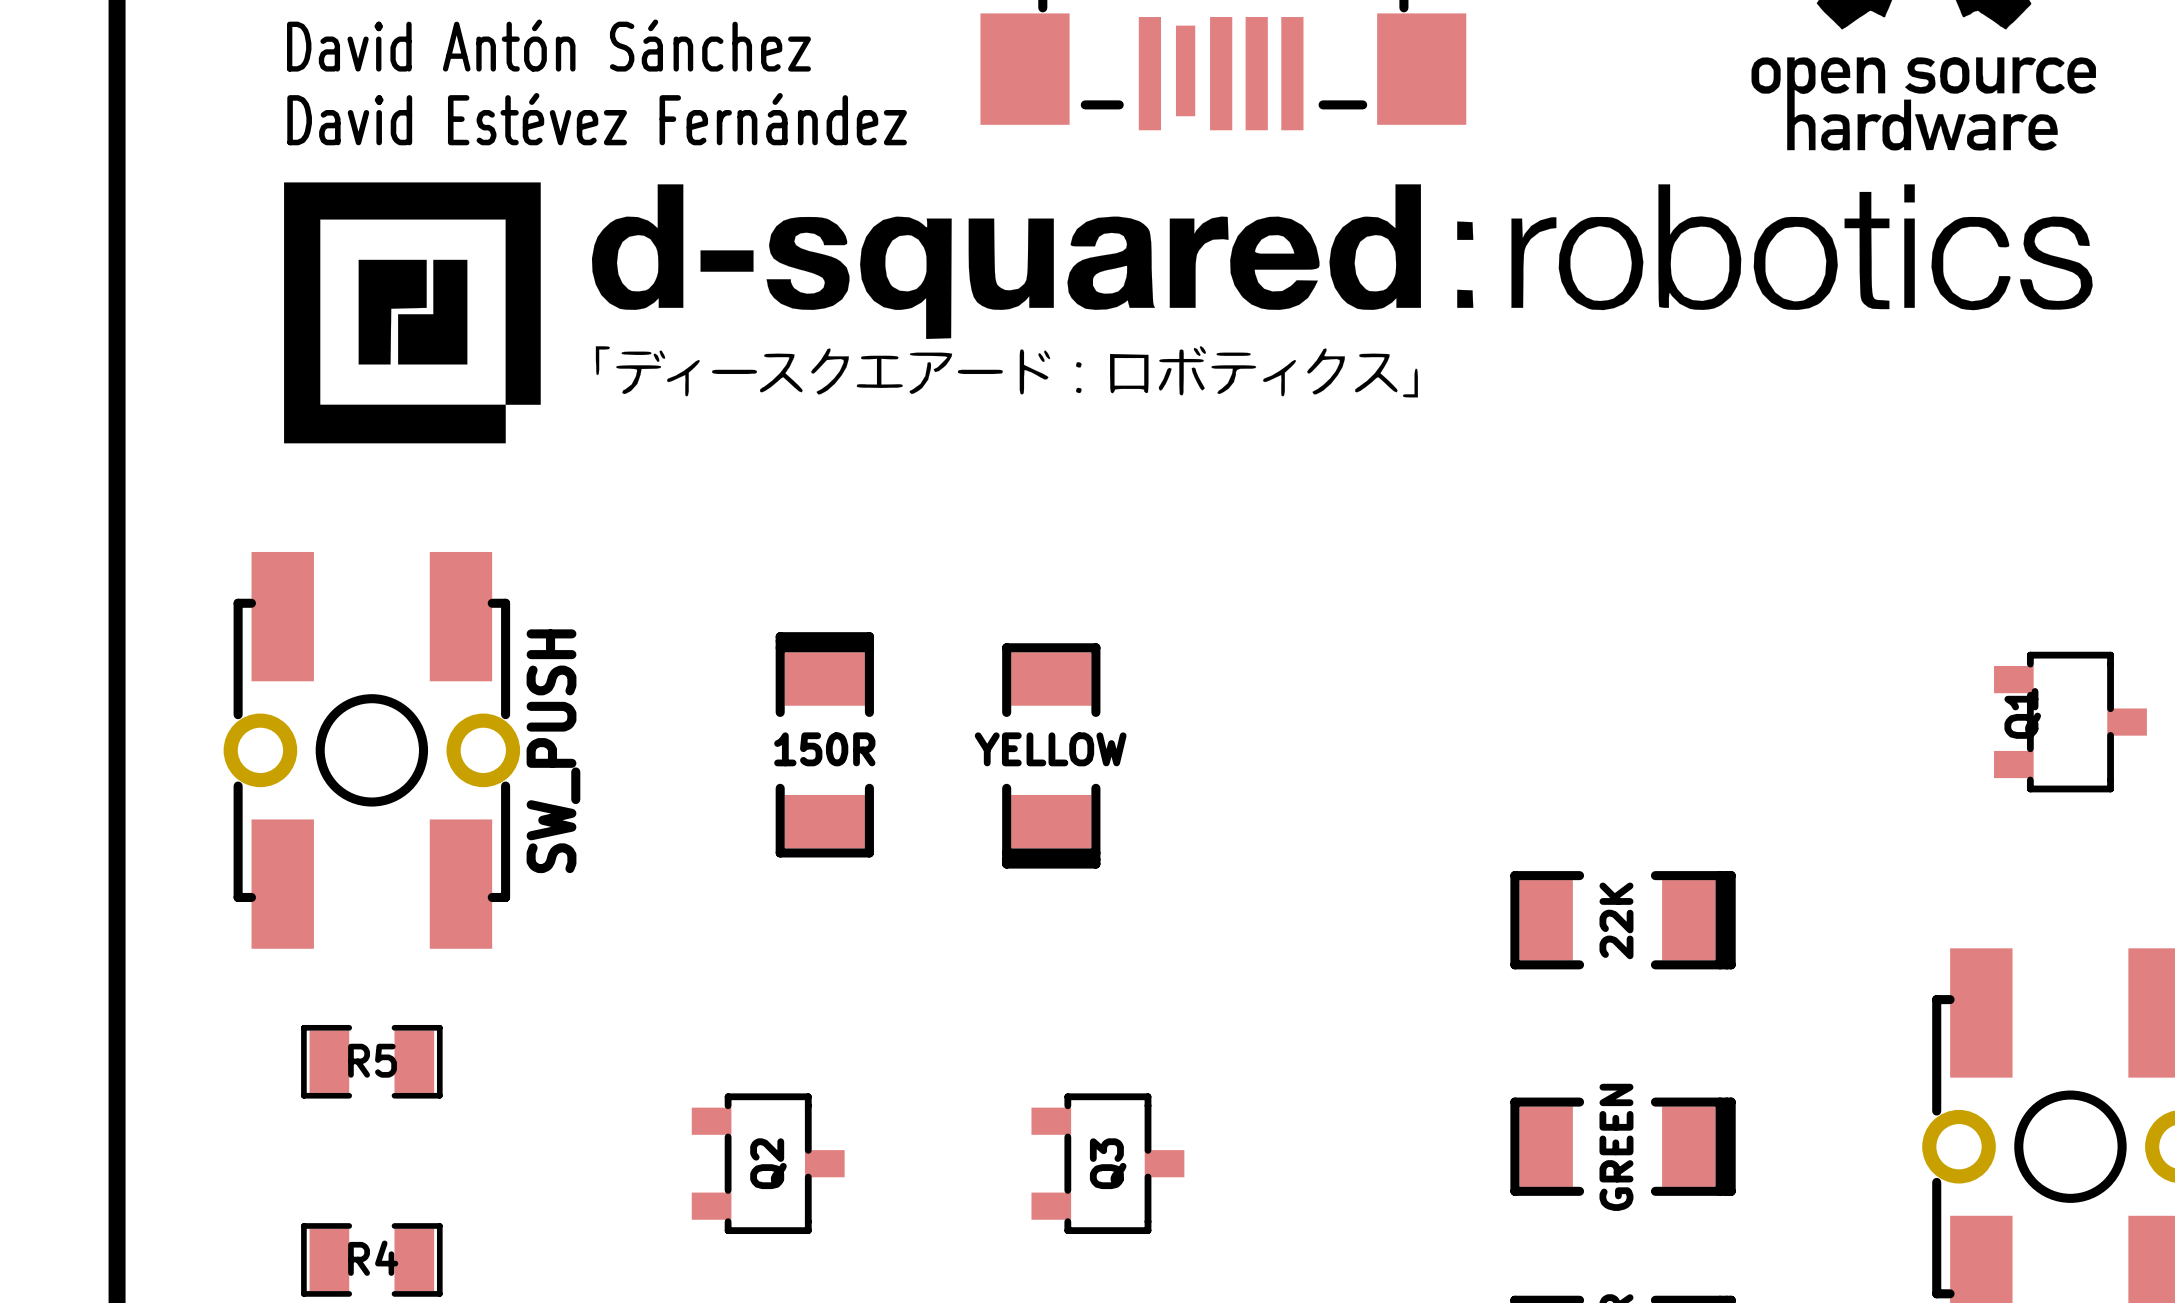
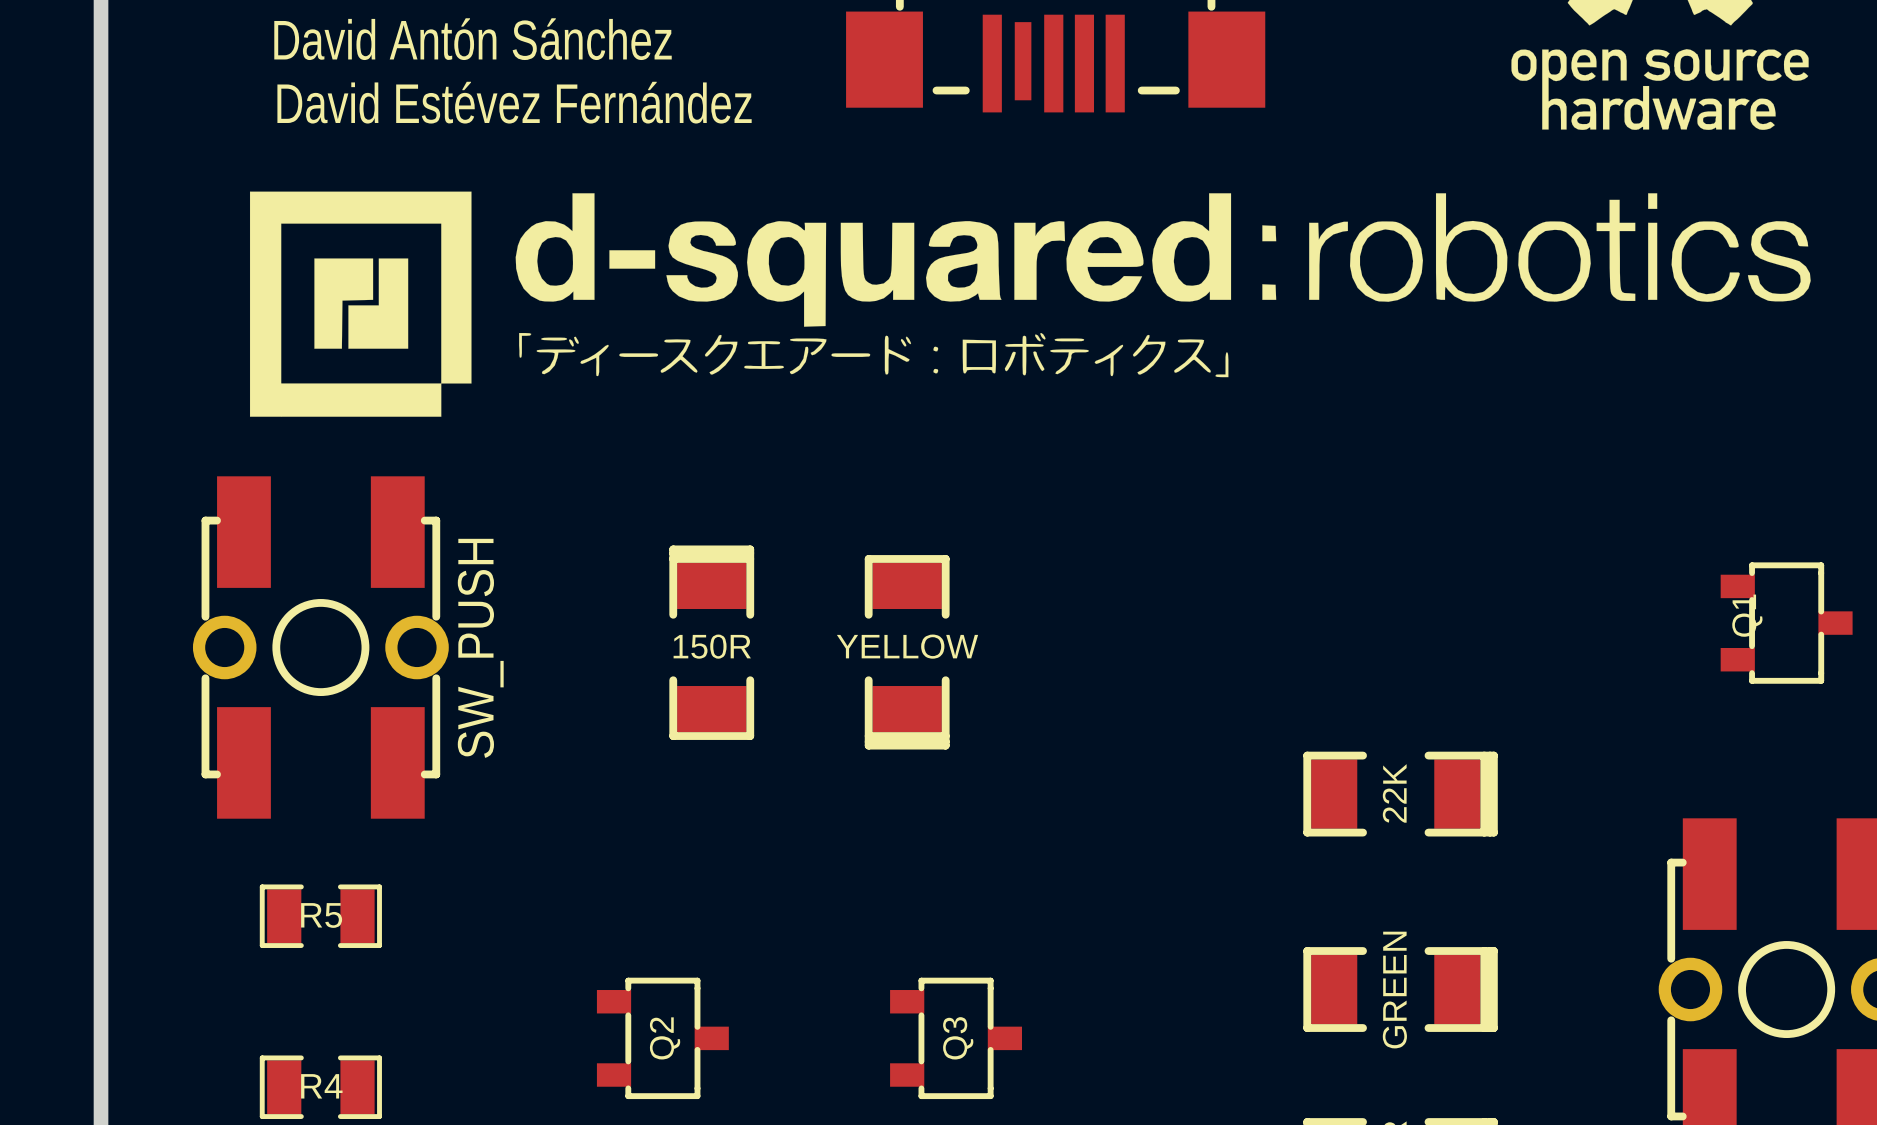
drawing position: (1188, 312) -> (1030, 304)
Q2 position: (768, 1163) -> (662, 1038)
Q3 position: (1107, 1163) -> (956, 1038)

